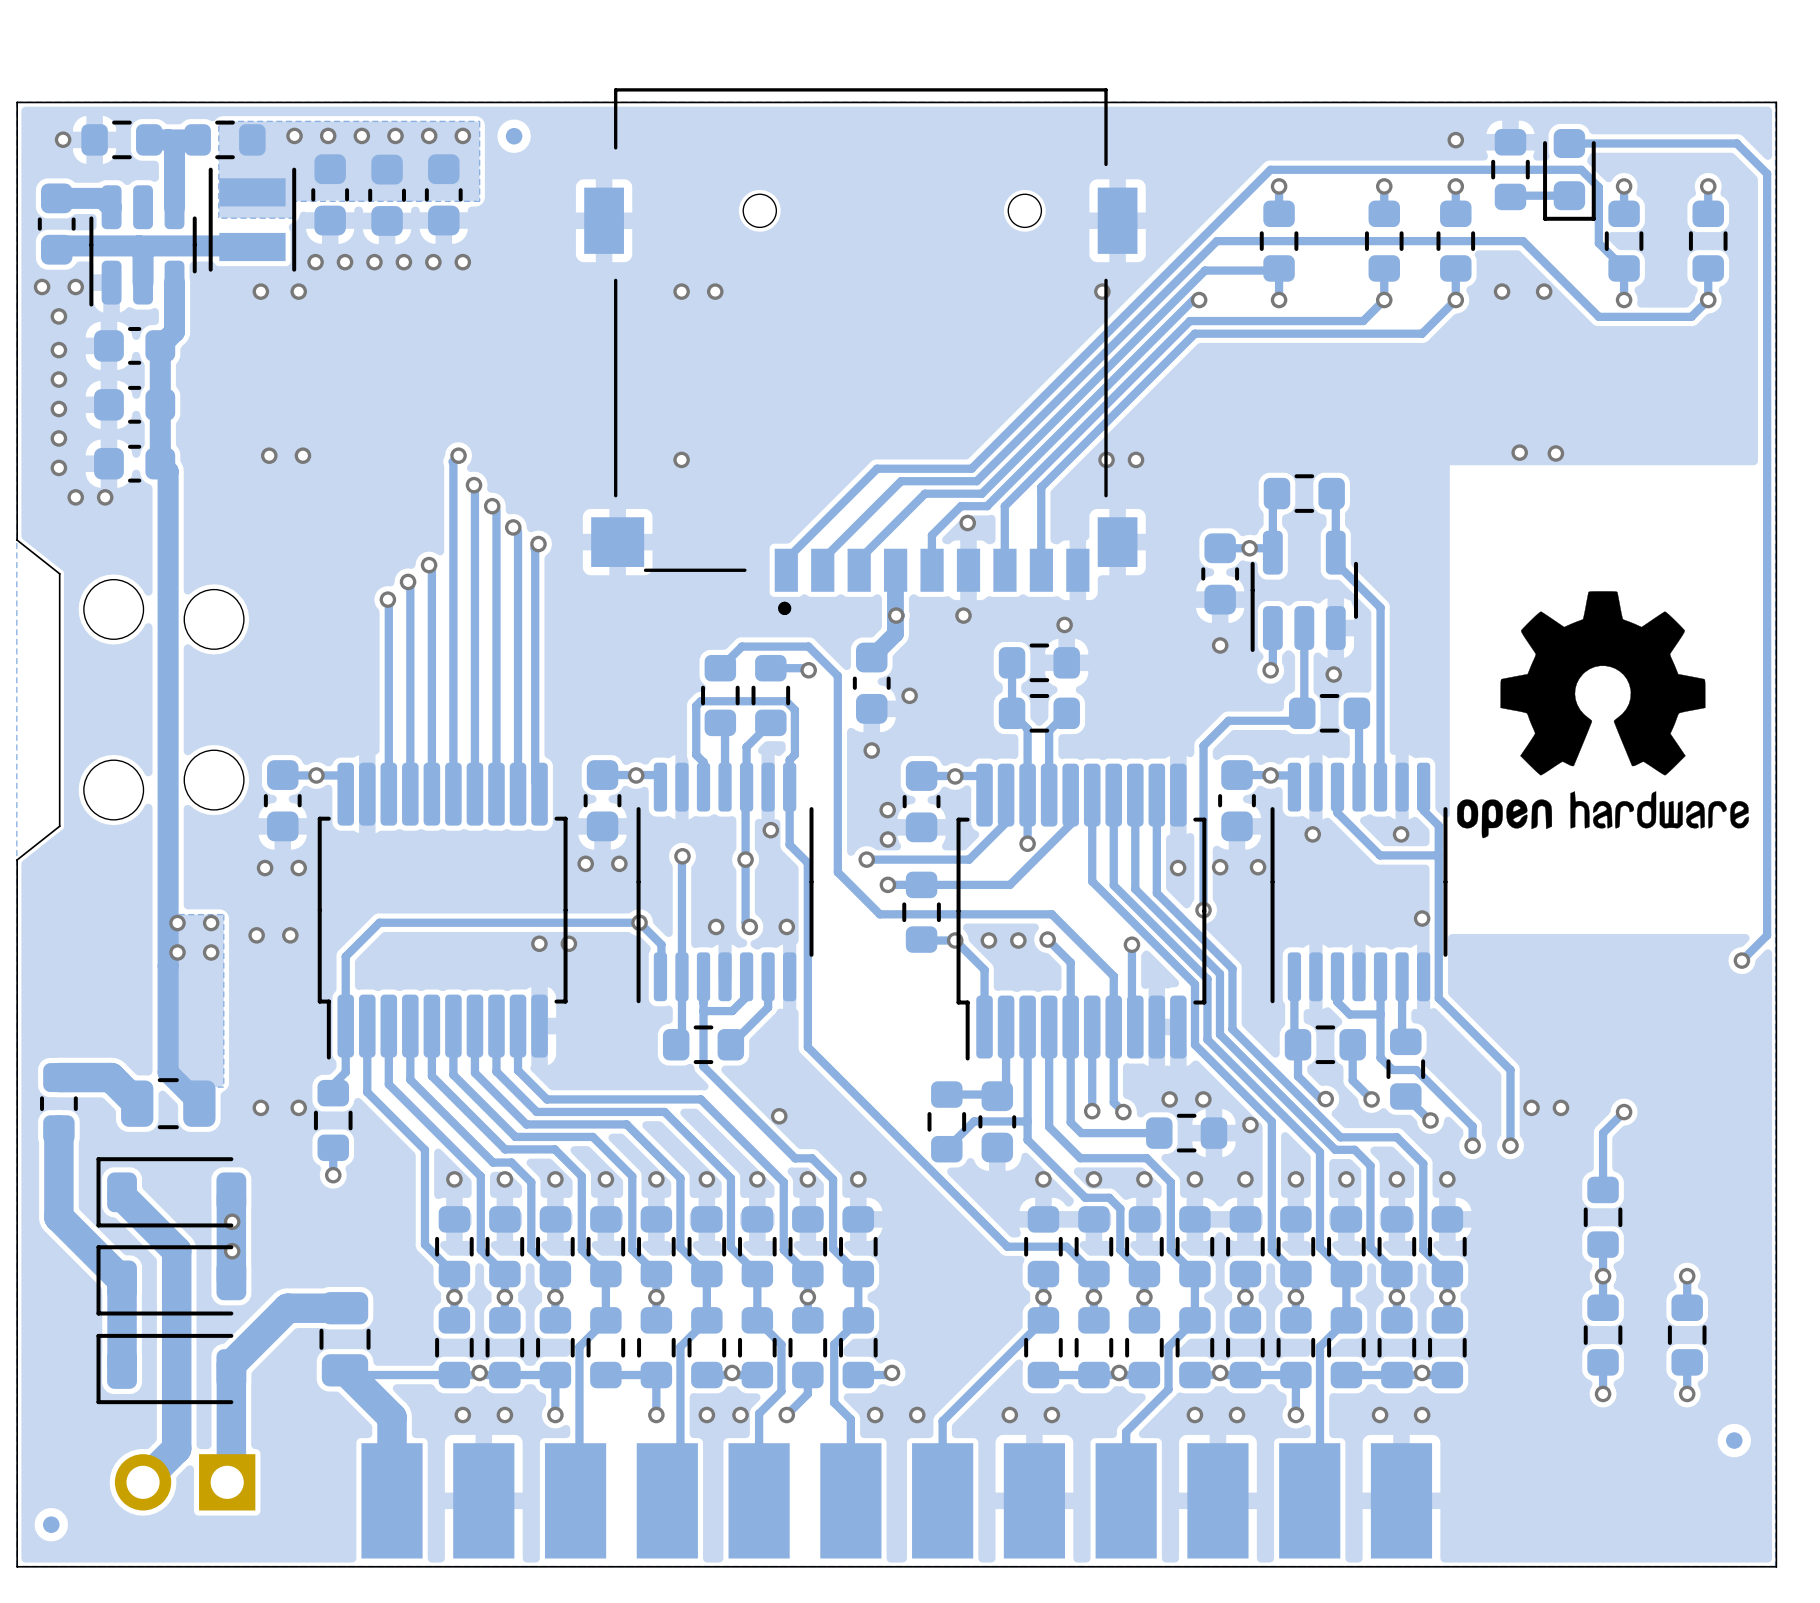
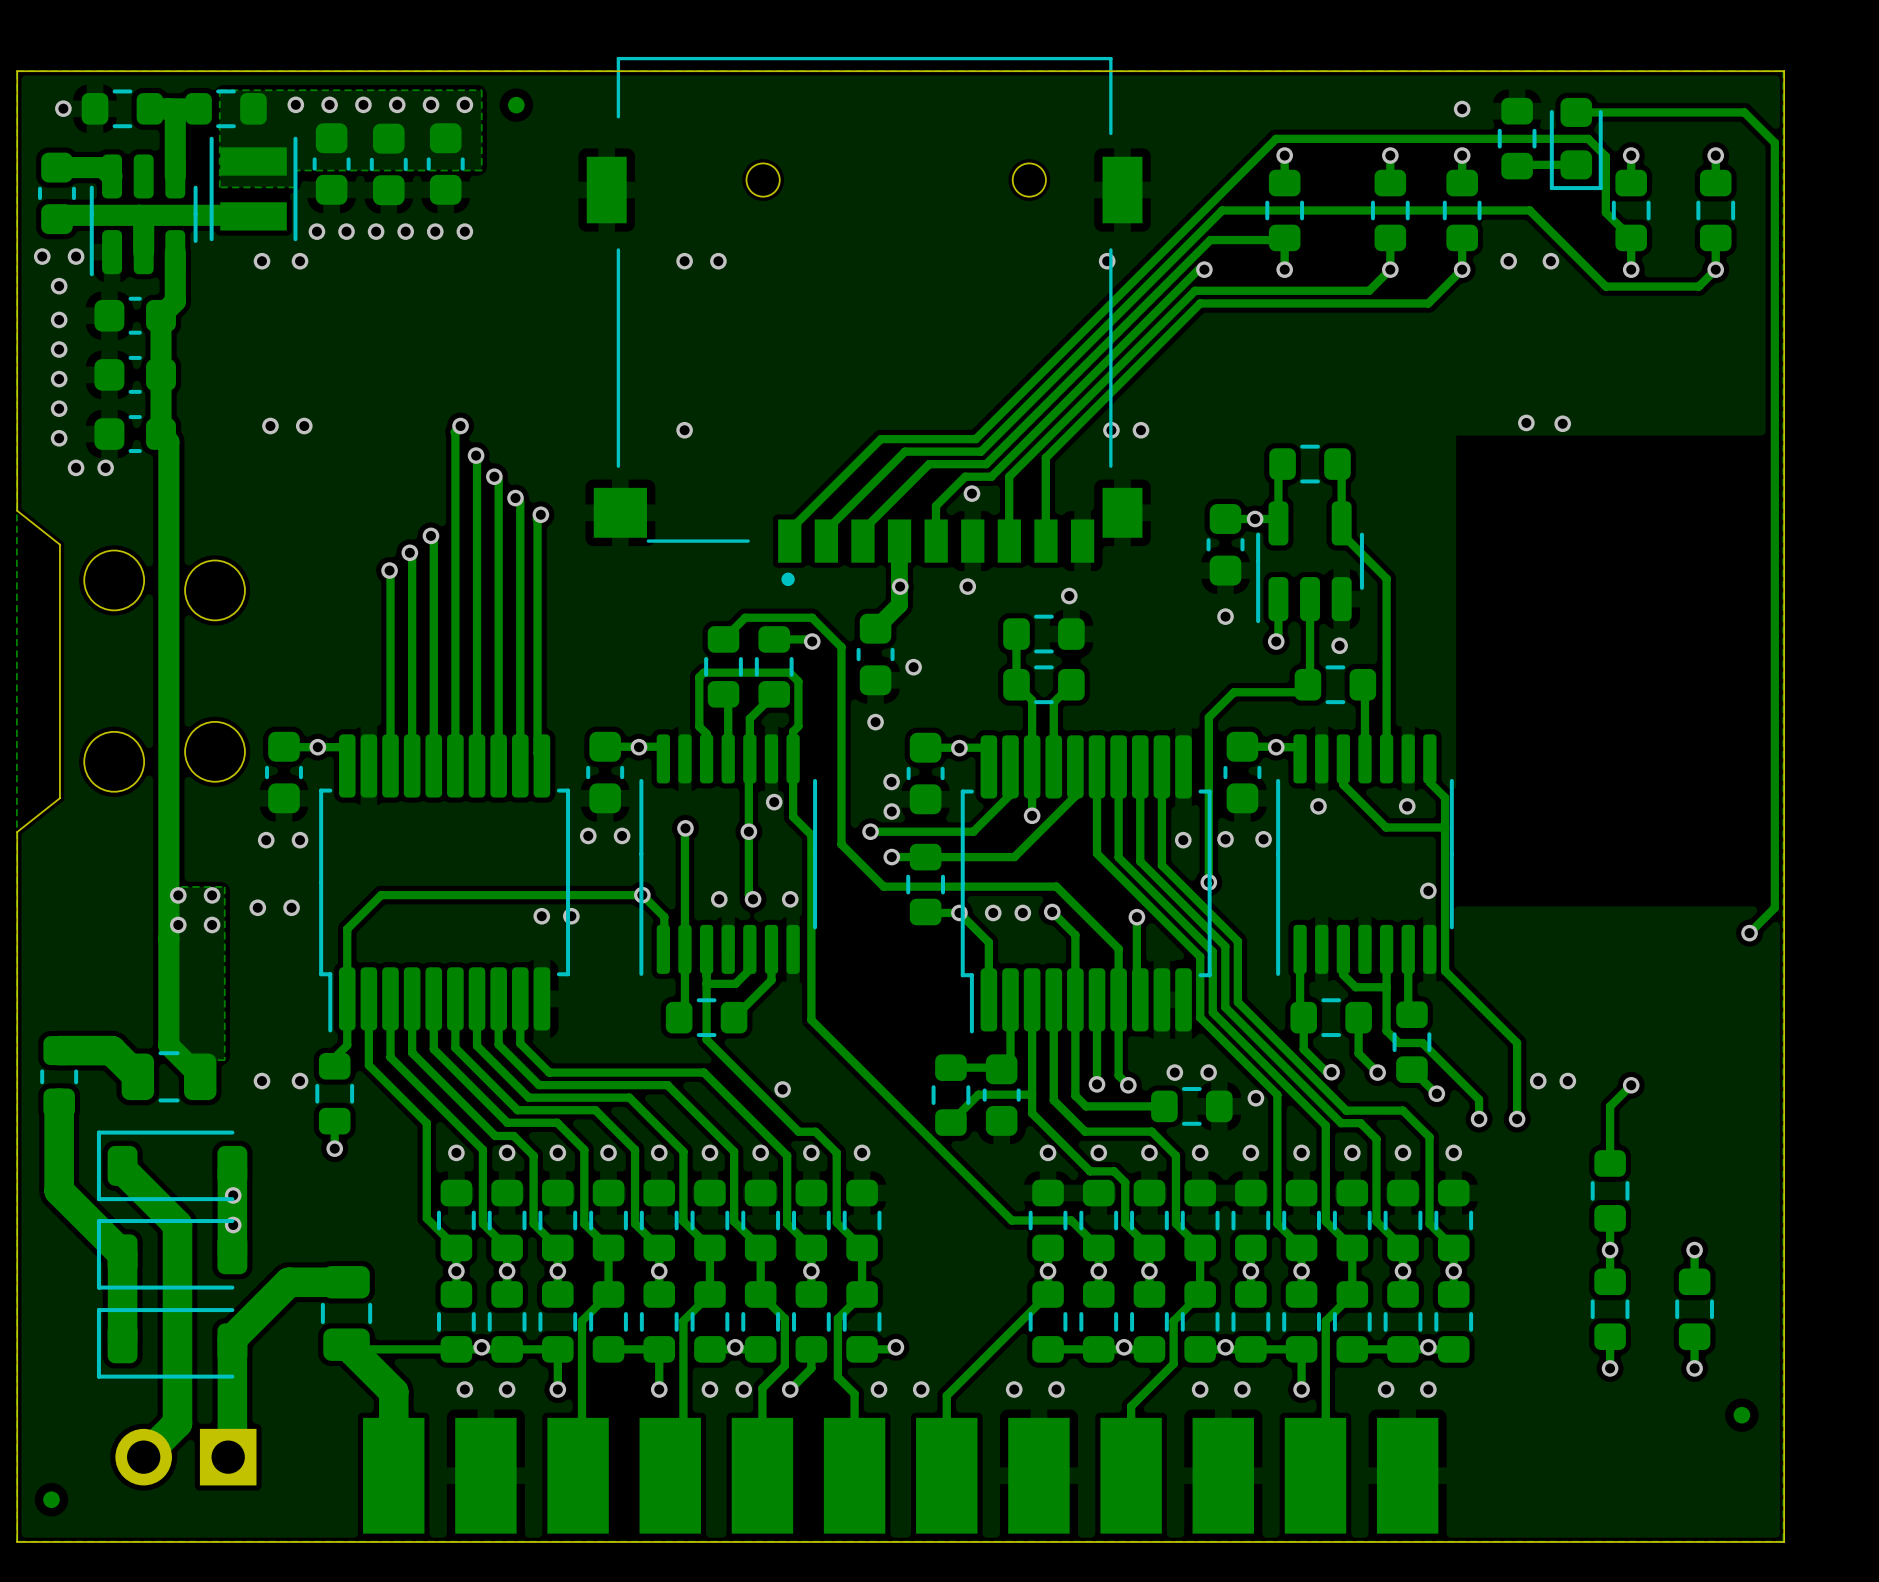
drawing: [1457, 591, 1749, 839] -> none

